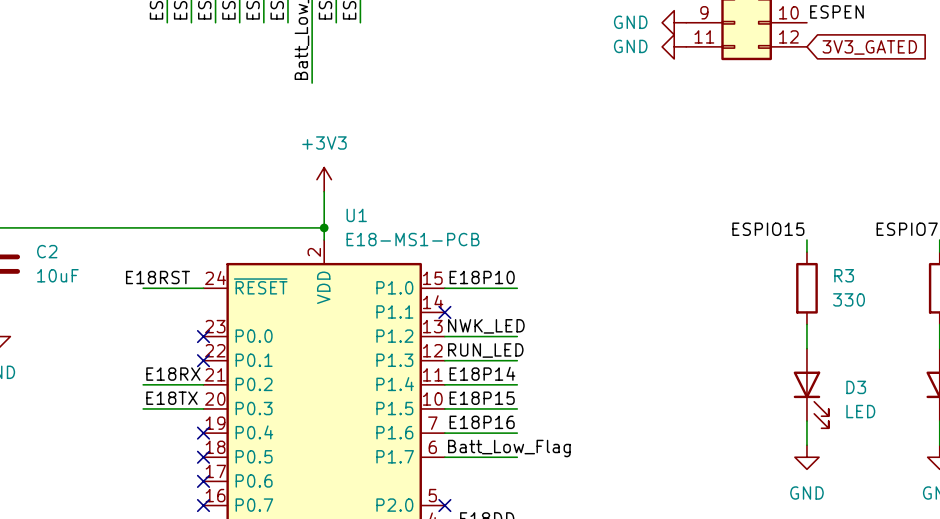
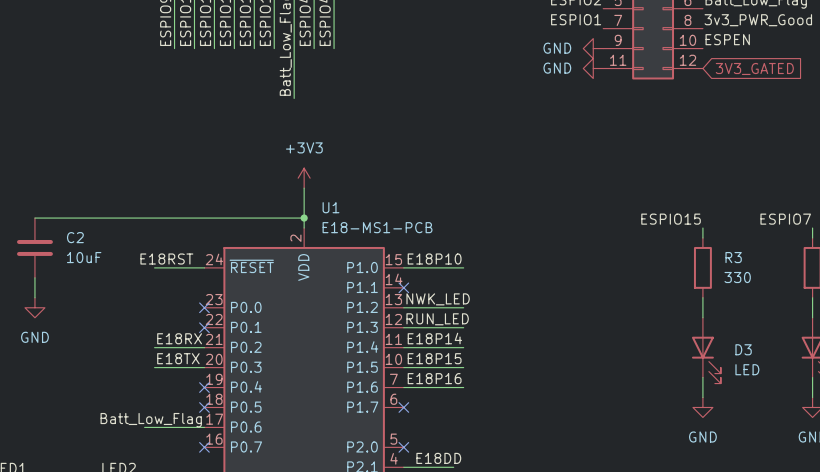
label: Batt_Low_Flag (509, 448) -> none
wire: (444, 457) (517, 457) -> none
no-connect mark: none -> (403, 407)
label: none -> Batt_Low_Flag (151, 420)
wire: none -> (144, 427) (204, 427)
no-connect mark: (203, 481) -> none

